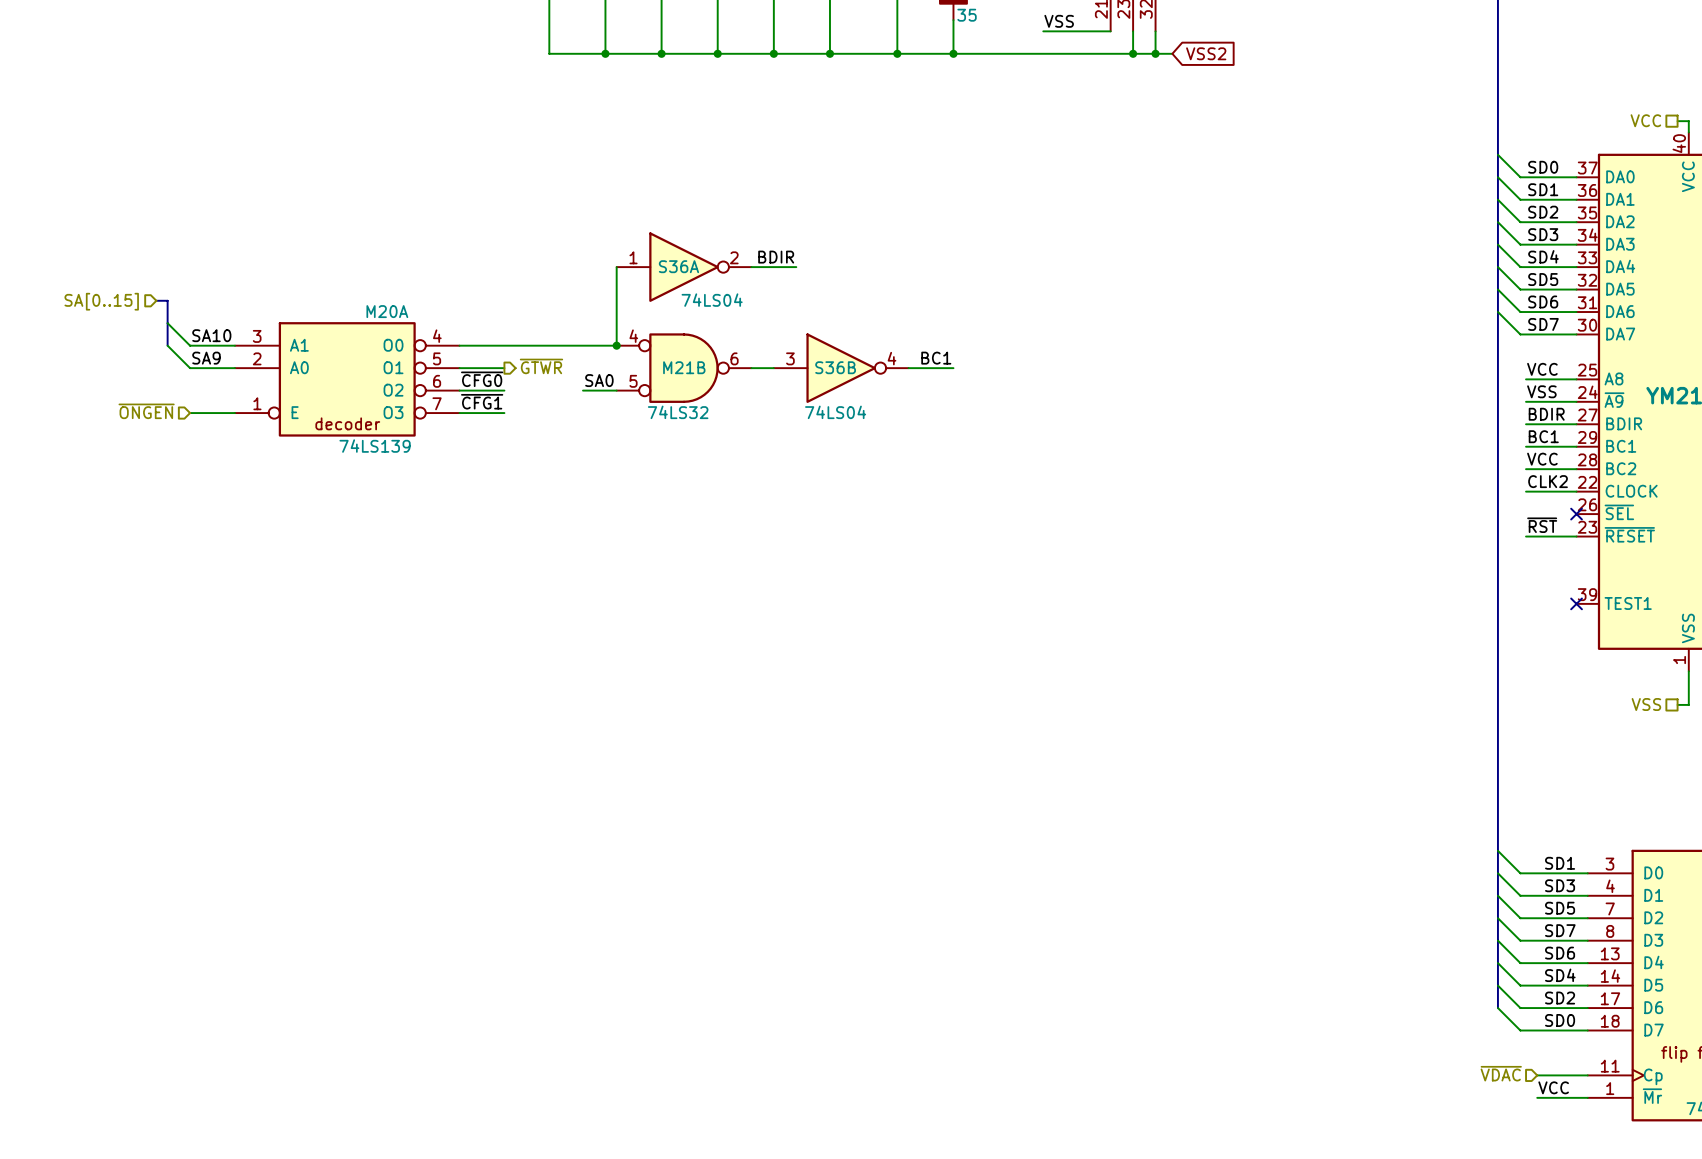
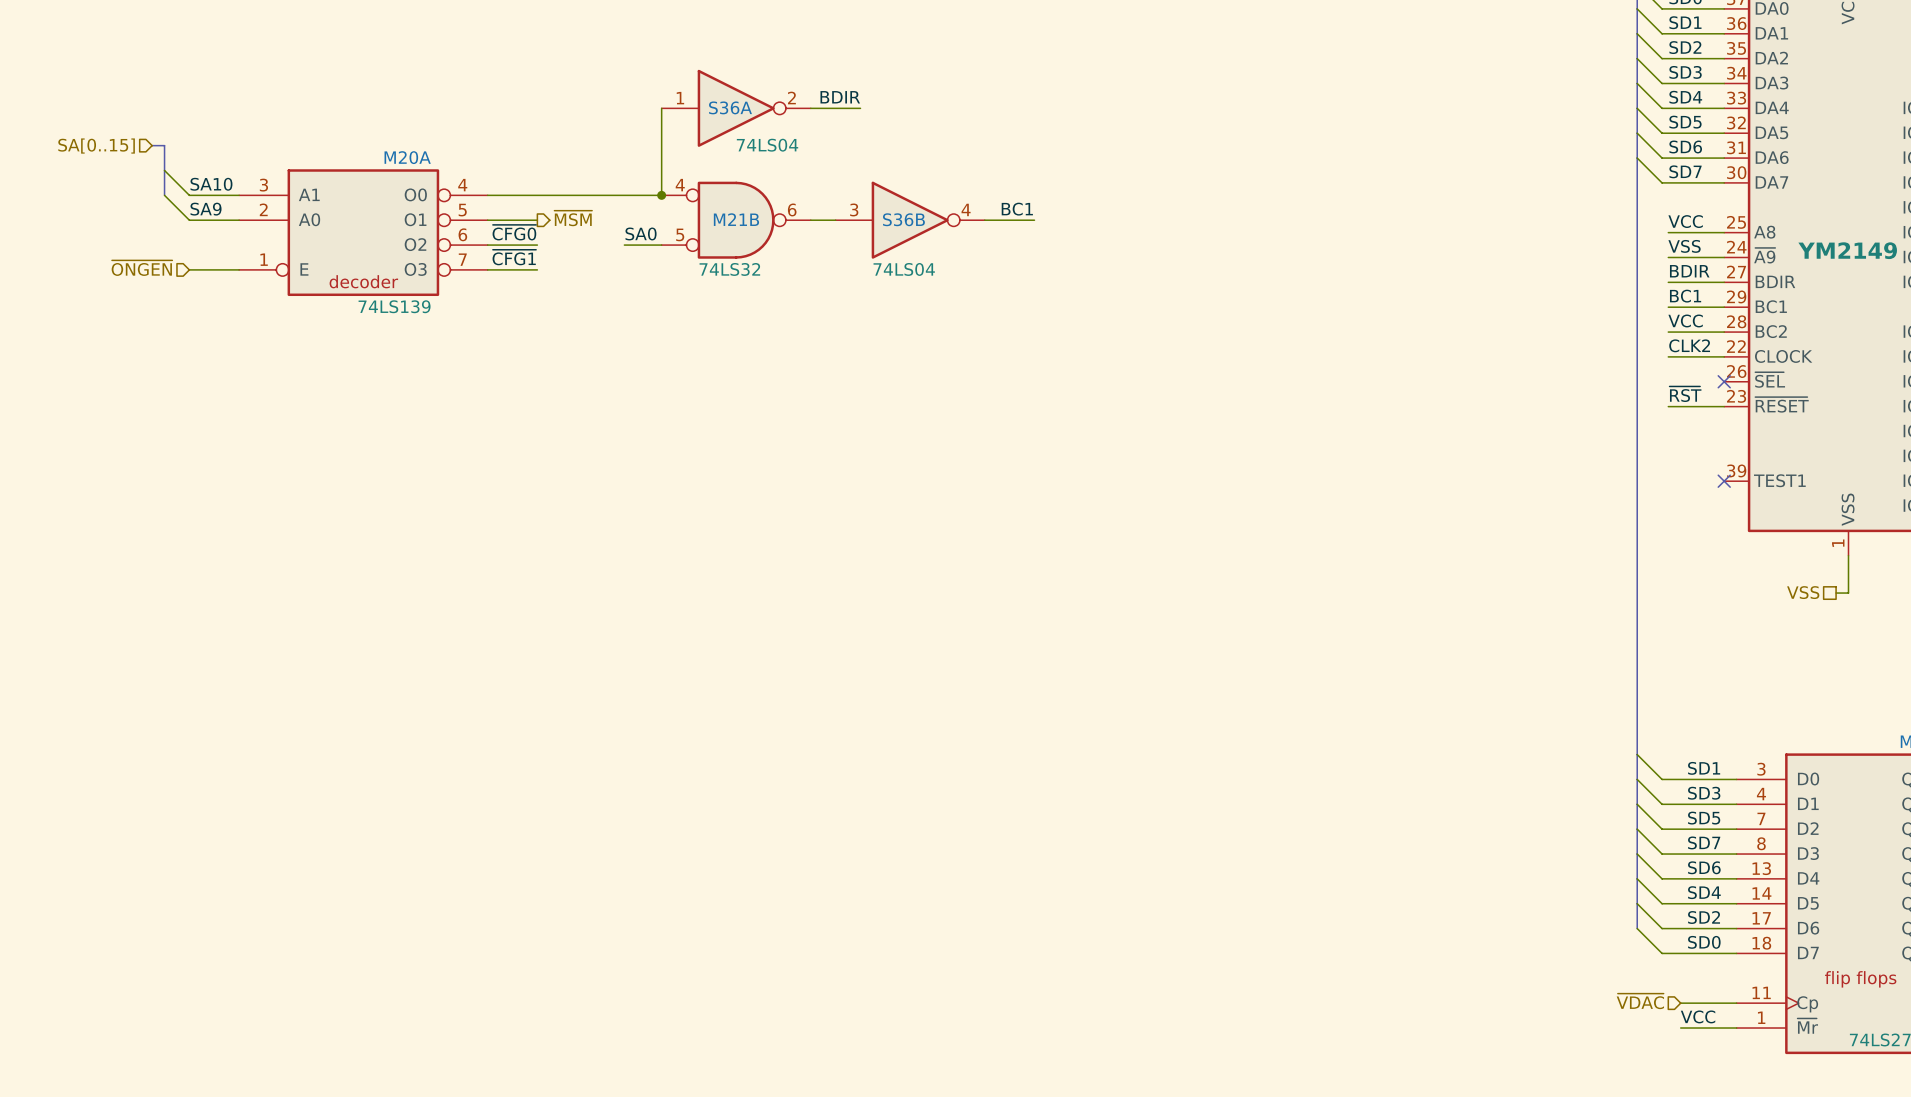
hierarchical label: ~{GTWR} (541, 366) -> ~{MSM} (573, 218)

